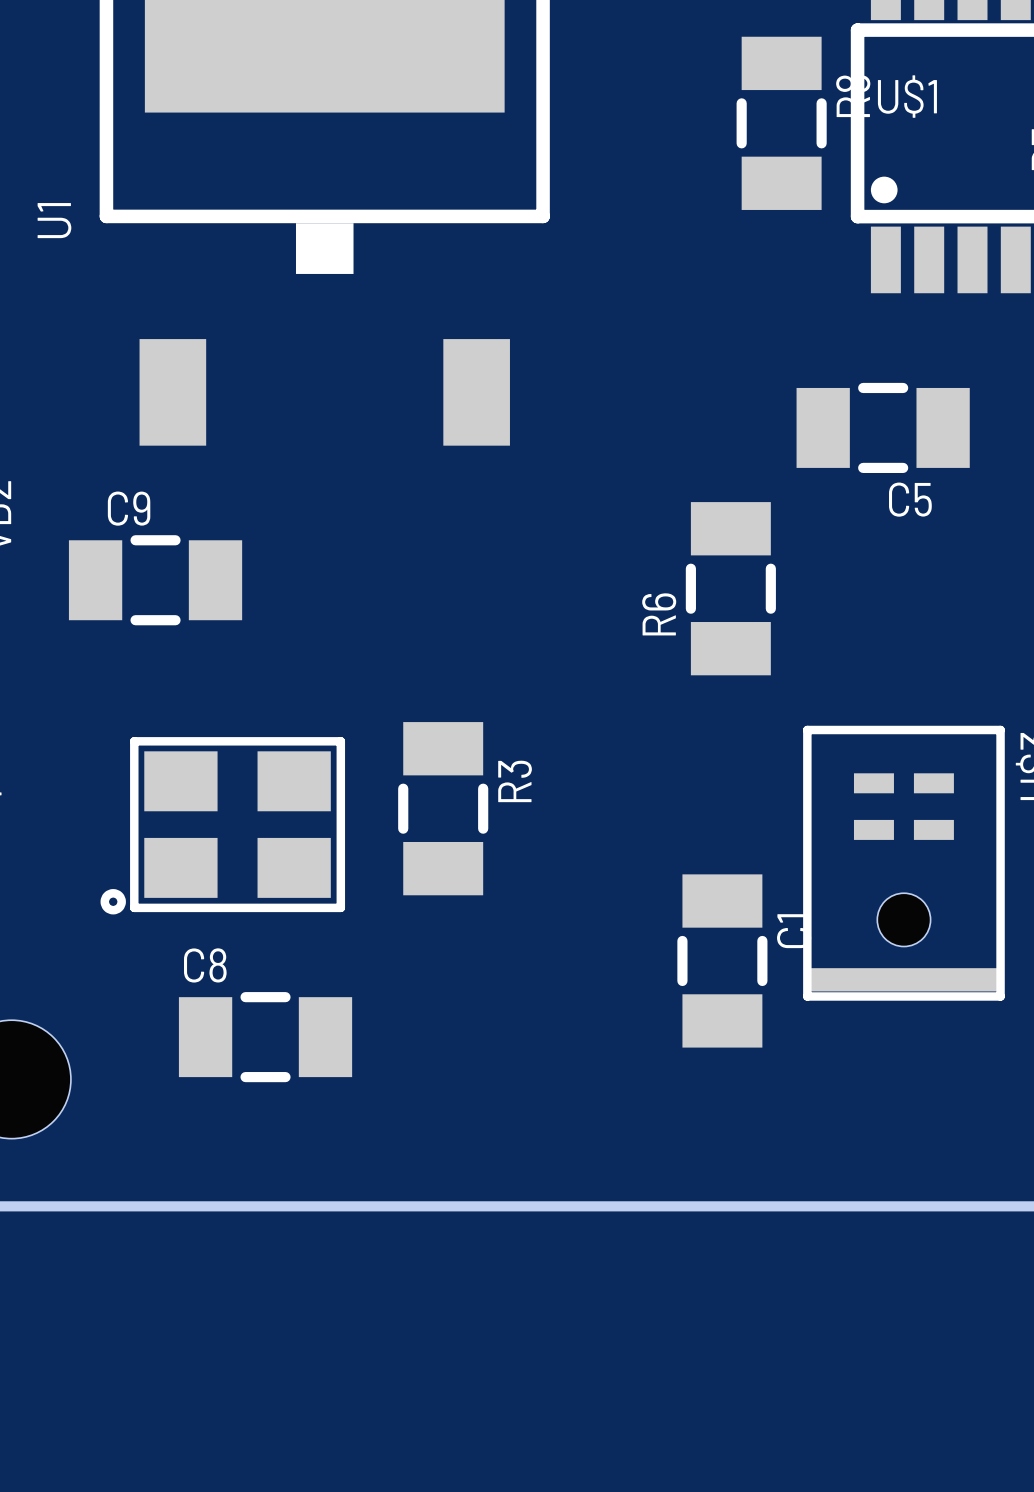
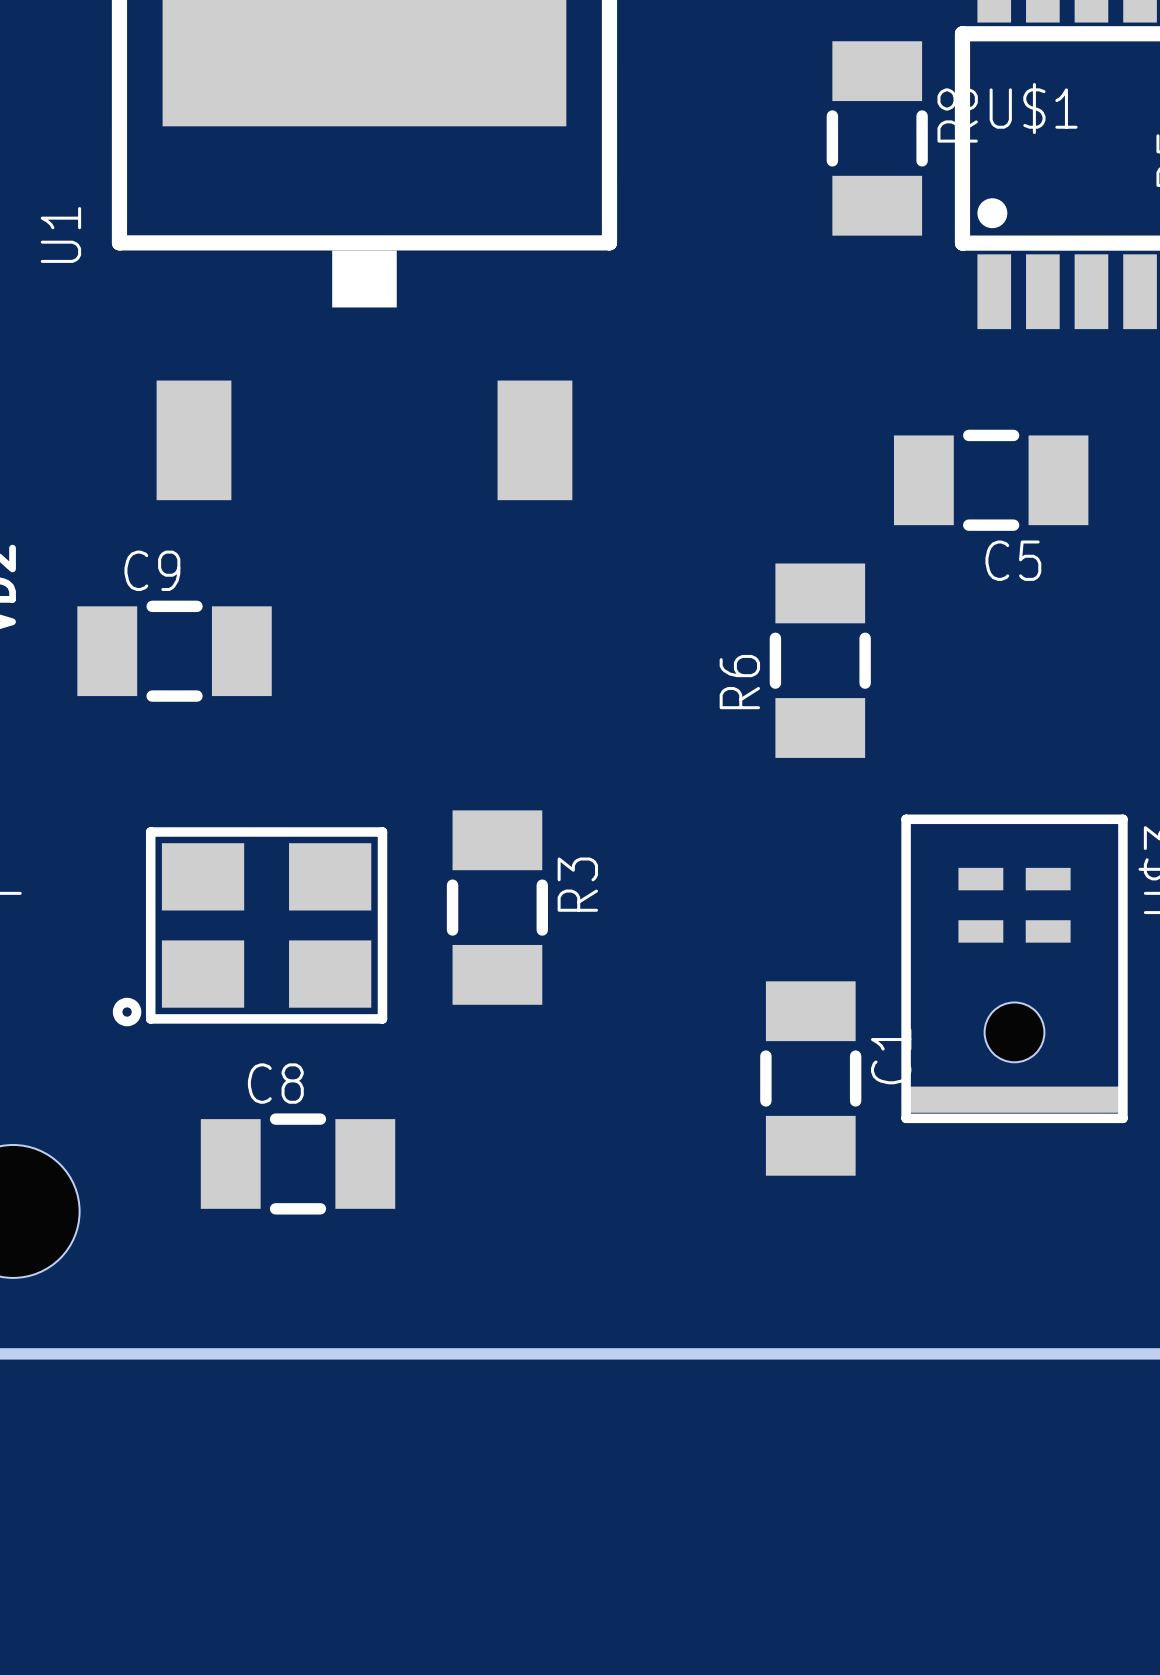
C8 name position: C8 (205, 965) -> C8 (275, 1083)

